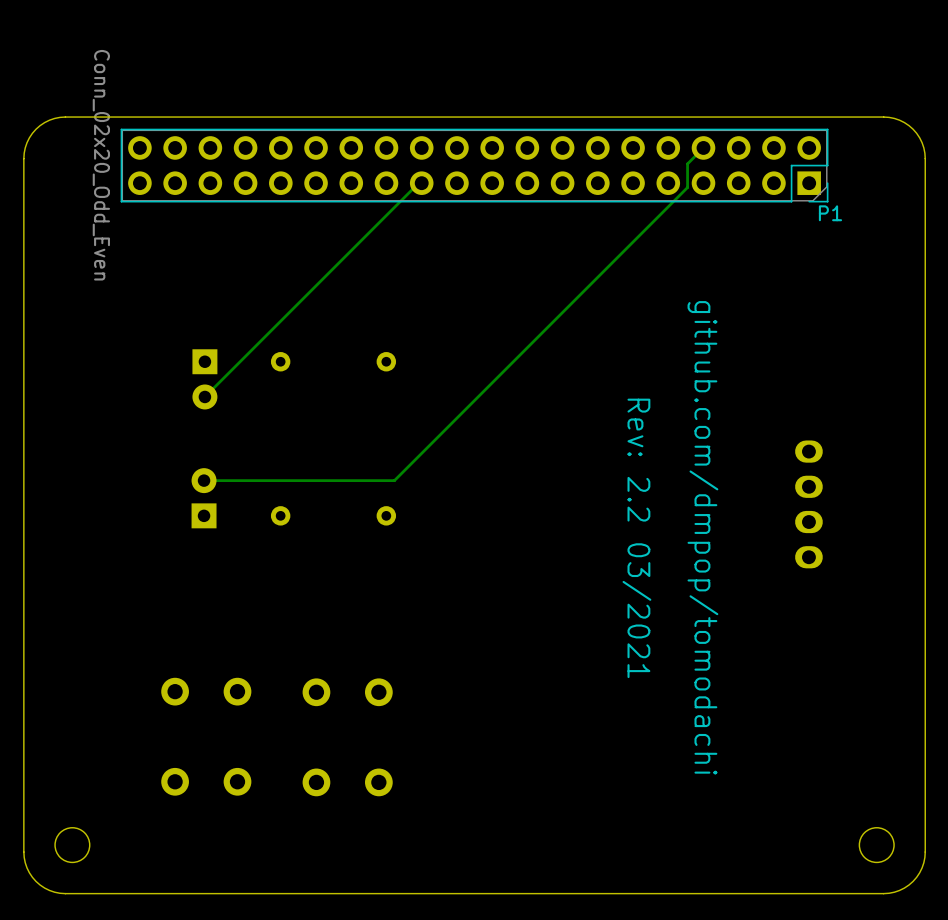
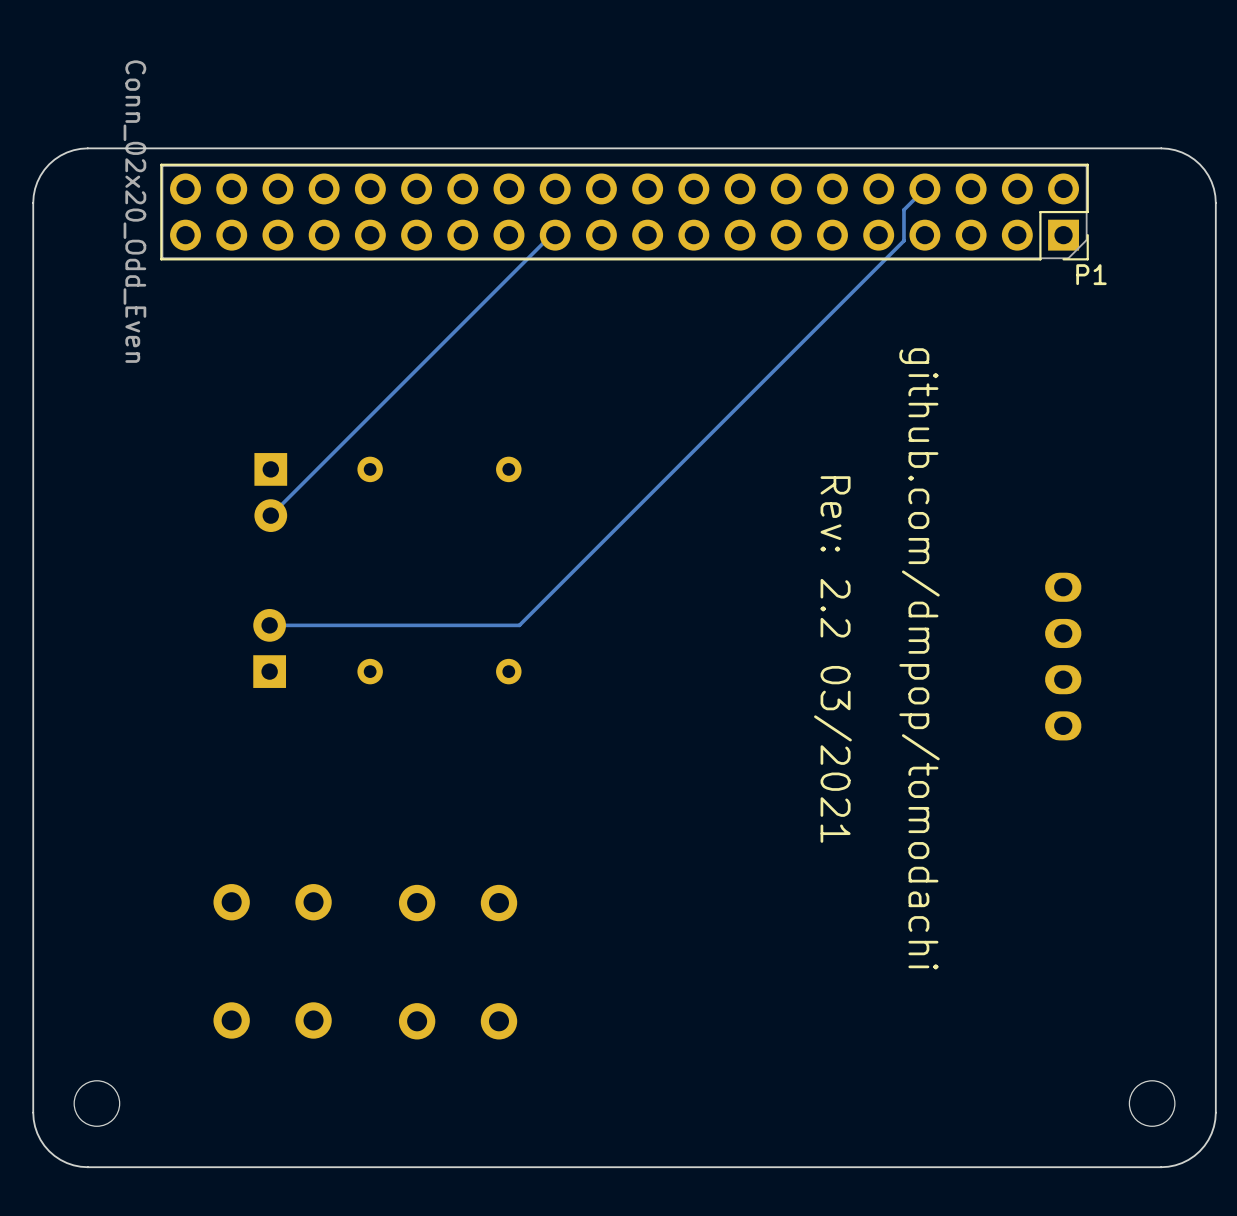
text position: github.com/dmpop/tomodachi (702, 537) -> github.com/dmpop/tomodachi (919, 658)
text position: Rev: 2.2 03/2021 (636, 538) -> Rev: 2.2 03/2021 (832, 659)

